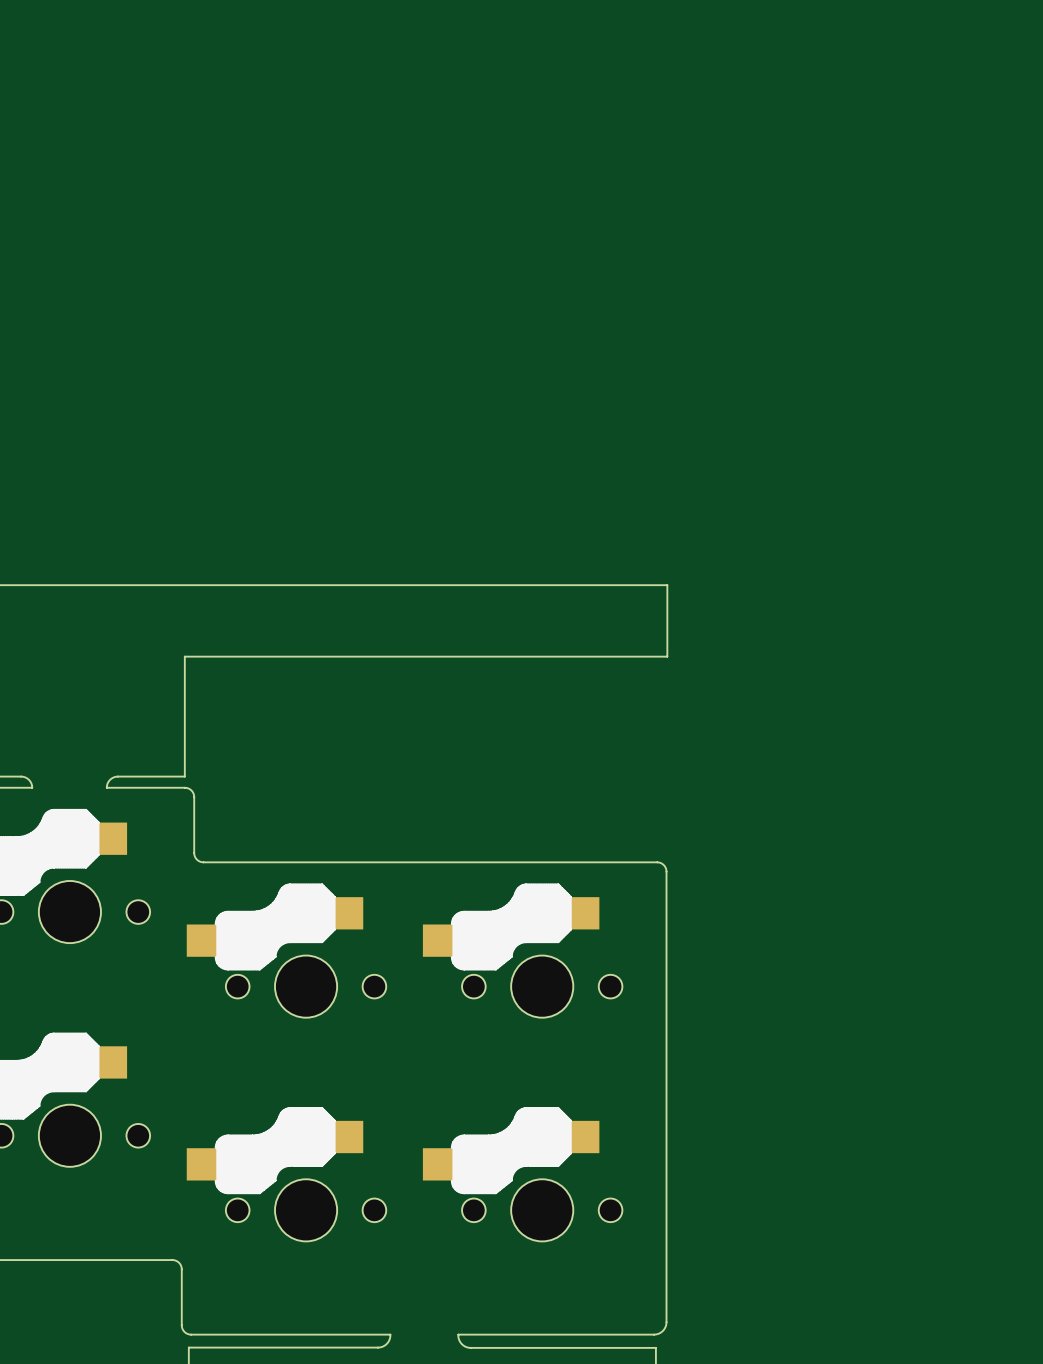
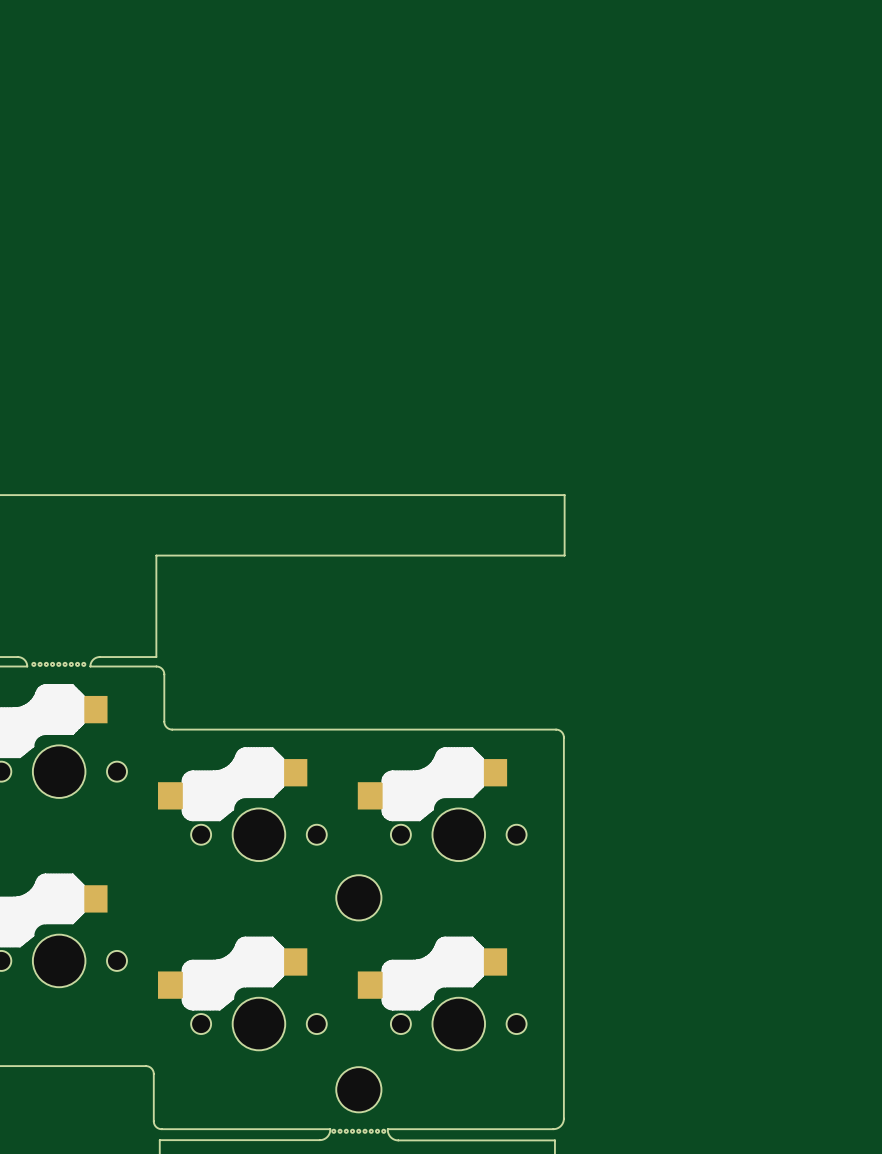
part: none -> (58, 664)
part: none -> (358, 897)
part: none -> (358, 1089)
part: none -> (358, 1131)

